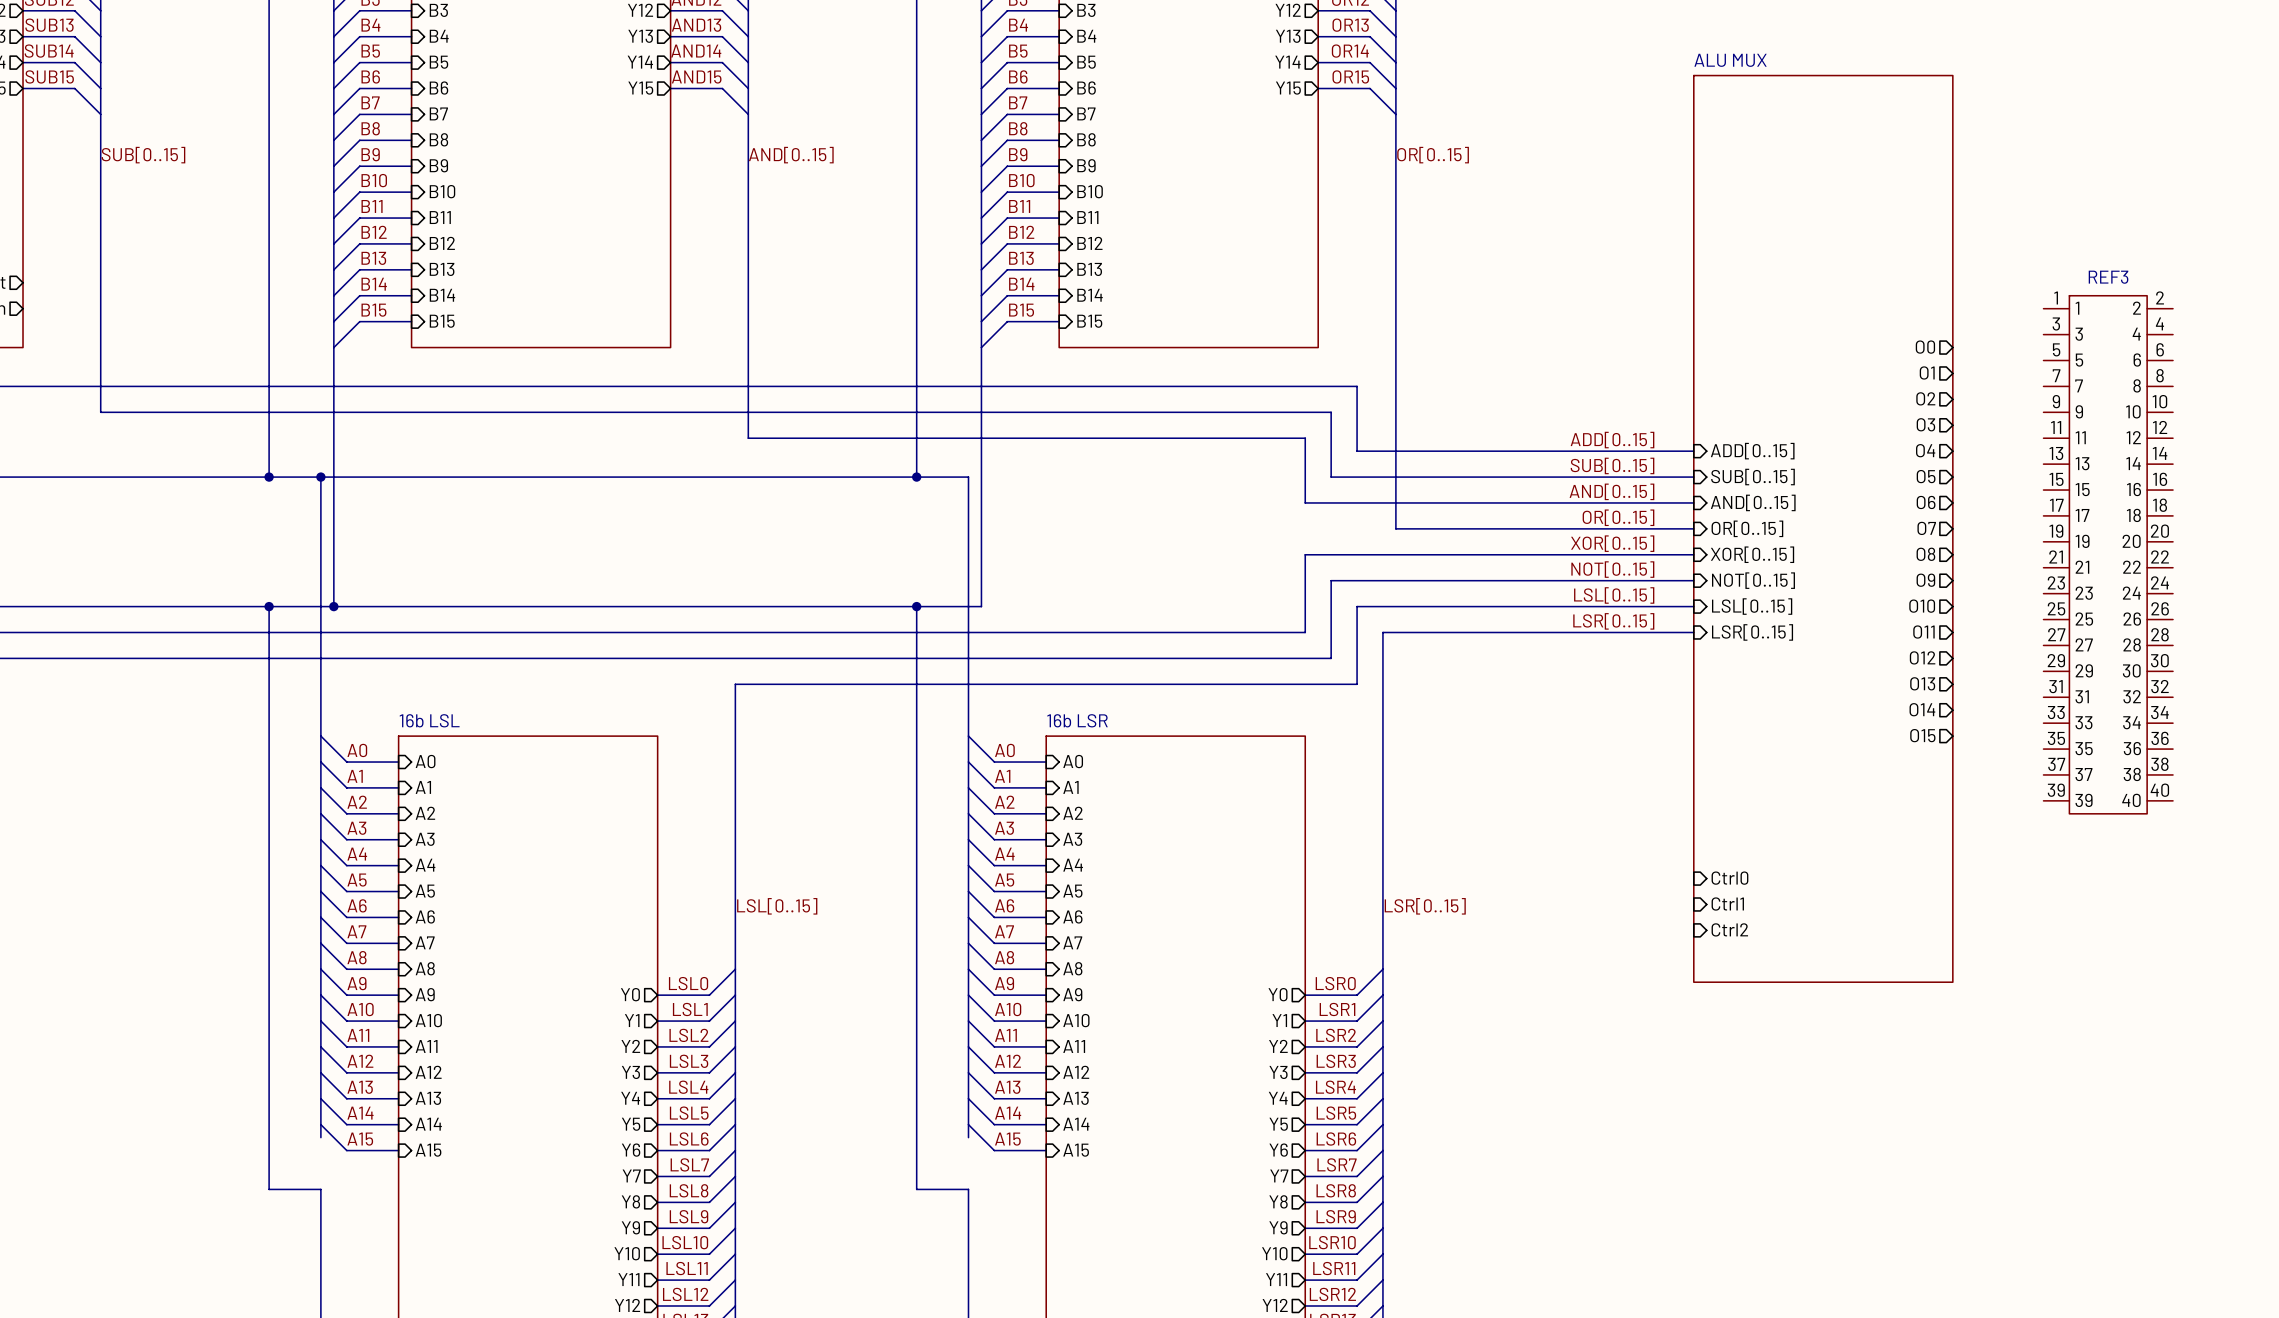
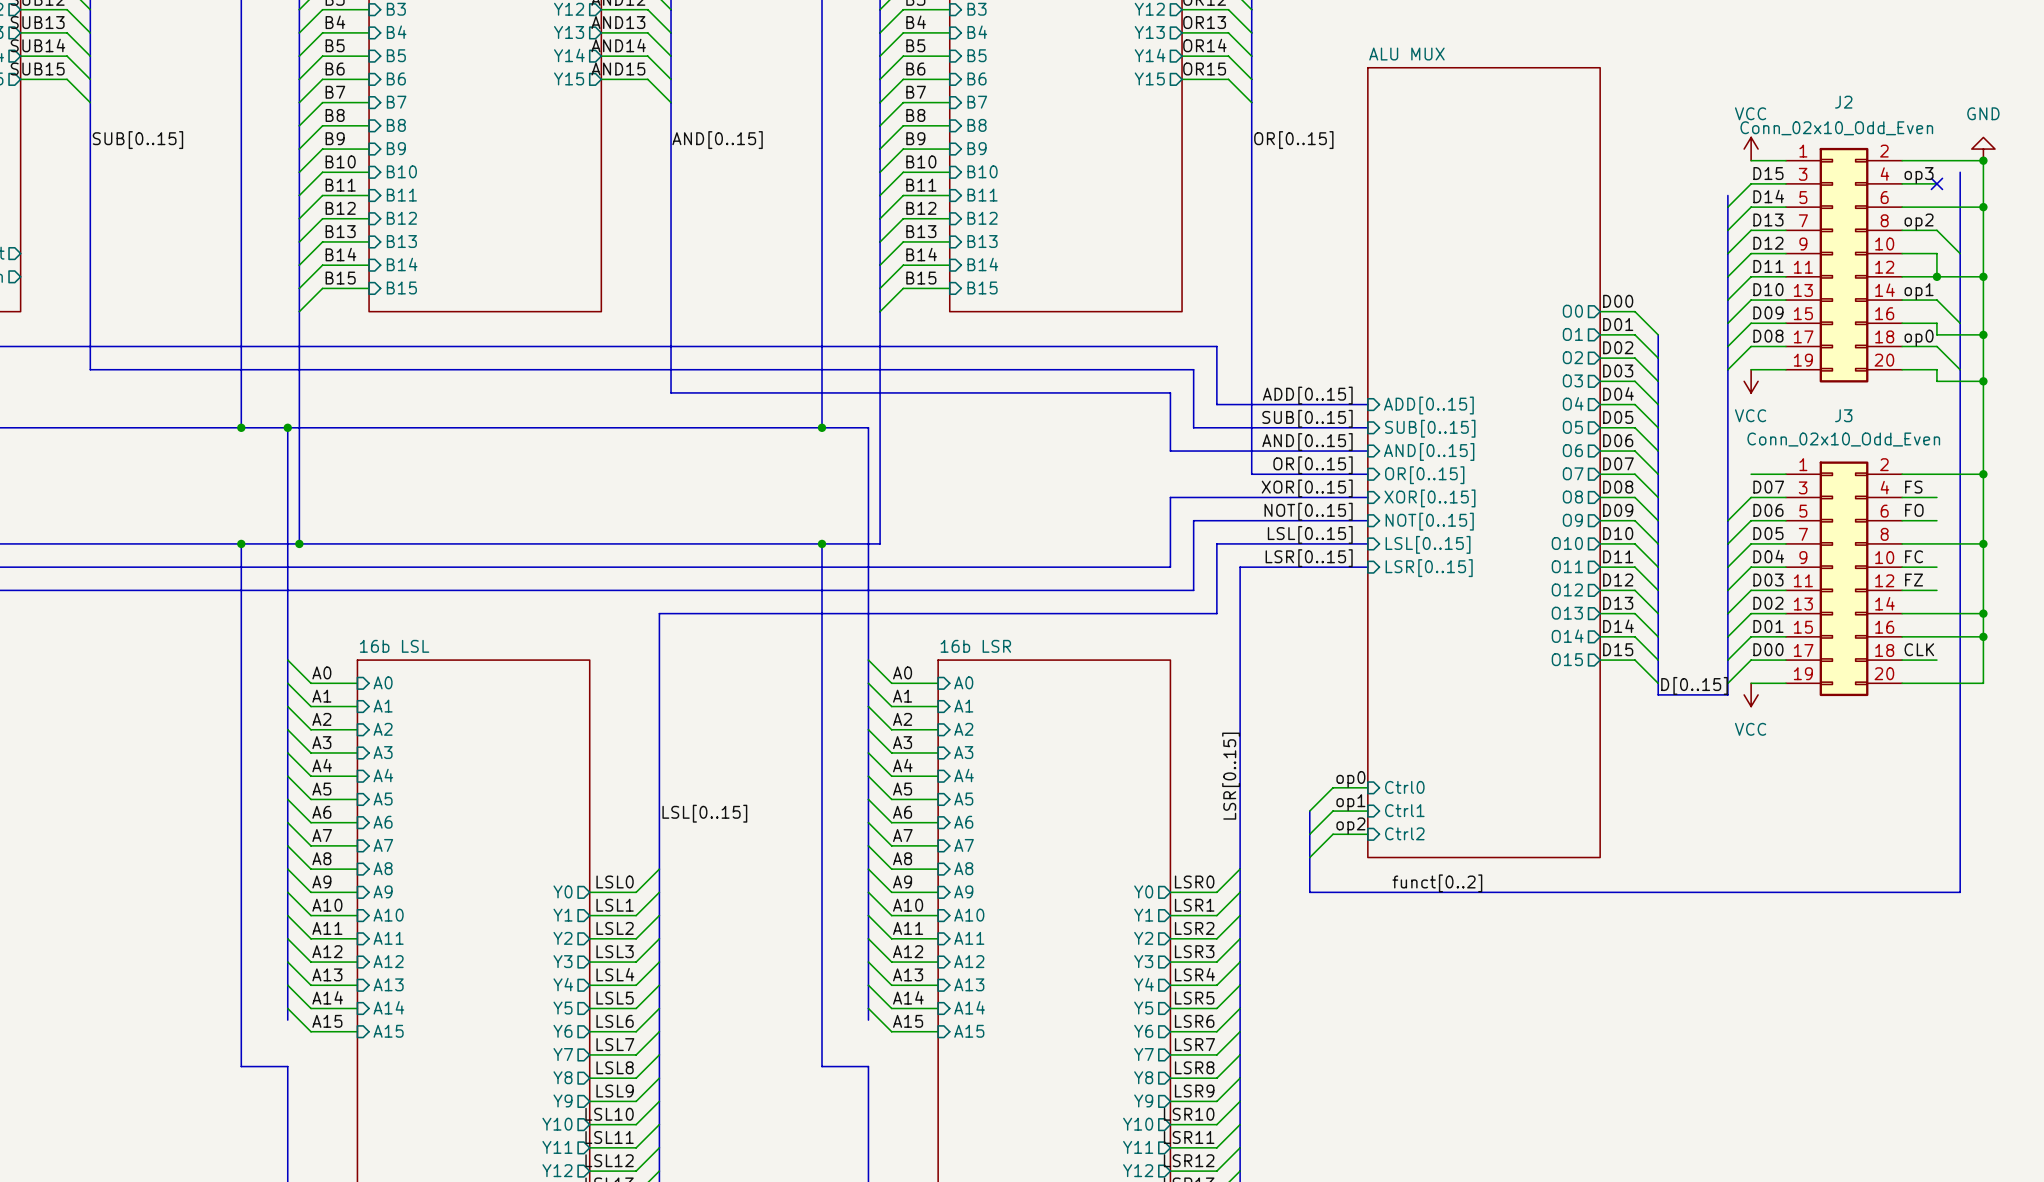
power symbol: none -> VCC (1751, 149)
power symbol: none -> GND (1983, 149)
wire: none -> (1751, 160) (1785, 160)
wire: none -> (1902, 160) (1983, 160) (1983, 683) (1902, 683)
junction: none -> (1983, 160)
bus: none -> (1960, 172) (1960, 892) (1309, 892) (1309, 811)
label: none -> D15 (1768, 173)
label: none -> op3 (1919, 175)
wire: none -> (1785, 183) (1751, 183) (1727, 207)
wire: none -> (1902, 183) (1936, 183)
no-connect mark: none -> (1936, 183)
bus: none -> (1727, 195) (1727, 694) (1658, 694) (1658, 334)
label: none -> D14 (1768, 196)
wire: none -> (1785, 207) (1751, 207) (1727, 230)
wire: none -> (1902, 207) (1983, 207)
junction: none -> (1983, 207)
label: none -> D13 (1768, 219)
label: none -> op2 (1919, 221)
wire: none -> (1785, 230) (1751, 230) (1727, 253)
wire: none -> (1902, 230) (1936, 230) (1960, 253)
label: none -> D12 (1768, 243)
wire: none -> (1785, 253) (1751, 253) (1727, 276)
wire: none -> (1902, 253) (1936, 253) (1936, 276)
J2: none -> Conn_02x10_Odd_Even (1844, 265)
label: none -> D11 (1768, 266)
wire: none -> (1785, 276) (1751, 276) (1727, 300)
wire: none -> (1902, 276) (1983, 276)
junction: none -> (1936, 276)
junction: none -> (1983, 276)
label: none -> D10 (1768, 289)
label: none -> op1 (1919, 291)
wire: none -> (1785, 300) (1751, 300) (1727, 323)
wire: none -> (1902, 300) (1936, 300) (1960, 323)
label: none -> D00 (1618, 301)
wire: none -> (1600, 311) (1634, 311) (1658, 334)
sheet pin position: O0 (1925, 347) -> O0 (1572, 311)
label: none -> D09 (1768, 312)
wire: none -> (1785, 323) (1751, 323) (1727, 346)
wire: none -> (1902, 323) (1936, 323) (1936, 334) (1983, 334)
label: none -> D01 (1618, 324)
sheet pin position: O1 (1927, 372) -> O1 (1572, 334)
wire: none -> (1600, 334) (1634, 334) (1658, 358)
junction: none -> (1983, 334)
label: none -> D08 (1768, 336)
label: none -> op0 (1919, 338)
wire: none -> (1785, 346) (1751, 346) (1727, 369)
wire: none -> (1902, 346) (1936, 346) (1960, 369)
label: none -> D02 (1618, 347)
sheet pin position: O2 (1925, 398) -> O2 (1572, 357)
wire: none -> (1600, 358) (1634, 358) (1658, 381)
wire: none -> (1751, 369) (1785, 369)
wire: none -> (1902, 369) (1936, 369) (1936, 381) (1983, 381)
label: none -> D03 (1618, 370)
sheet pin position: O3 (1925, 424) -> O3 (1572, 380)
wire: none -> (1600, 381) (1634, 381) (1658, 404)
power symbol: none -> VCC (1751, 381)
junction: none -> (1983, 381)
label: none -> D04 (1618, 393)
label position: ADD[0..15] (1612, 440) -> ADD[0..15] (1307, 395)
sheet pin position: O4 (1925, 450) -> O4 (1573, 403)
bus: (1525, 451) (1693, 451) -> none
sheet pin position: ADD[0..15] (1752, 451) -> ADD[0..15] (1428, 405)
wire: none -> (1600, 404) (1634, 404) (1658, 427)
label position: SUB[0..15] (1612, 465) -> SUB[0..15] (1307, 418)
label: none -> D05 (1618, 417)
sheet pin position: O5 (1926, 476) -> O5 (1572, 427)
bus: (1525, 477) (1693, 477) -> none
sheet pin position: SUB[0..15] (1753, 477) -> SUB[0..15] (1430, 428)
wire: none -> (1600, 427) (1634, 427) (1658, 451)
label position: AND[0..15] (1611, 491) -> AND[0..15] (1307, 442)
label: none -> D06 (1618, 440)
bus: (1525, 502) (1693, 502) -> none
sheet pin position: AND[0..15] (1753, 502) -> AND[0..15] (1429, 451)
wire: none -> (1600, 451) (1634, 451) (1658, 474)
sheet pin position: O6 (1926, 502) -> O6 (1572, 450)
sheet ALU MUX: none -> (1484, 462)
label position: OR[0..15] (1618, 517) -> OR[0..15] (1313, 465)
label: none -> D07 (1618, 463)
bus: (1525, 528) (1693, 528) -> none
sheet pin position: OR[0..15] (1747, 528) -> OR[0..15] (1424, 475)
wire: none -> (1600, 474) (1634, 474) (1658, 497)
sheet ALU MUX: (1823, 528) -> none
sheet pin position: O7 (1926, 528) -> O7 (1573, 473)
wire: none -> (1751, 474) (1785, 474)
wire: none -> (1902, 474) (1983, 474)
junction: none -> (1983, 474)
label position: XOR[0..15] (1612, 543) -> XOR[0..15] (1307, 488)
label: none -> D08 (1618, 487)
label: none -> D07 (1768, 487)
label: none -> FS (1913, 487)
bus: (1525, 554) (1693, 554) -> none
sheet pin position: XOR[0..15] (1752, 554) -> XOR[0..15] (1429, 498)
wire: none -> (1600, 497) (1634, 497) (1658, 520)
sheet pin position: O8 (1925, 554) -> O8 (1572, 497)
wire: none -> (1785, 497) (1751, 497) (1727, 520)
REF3: (2108, 554) -> none
wire: none -> (1902, 497) (1936, 497)
label position: NOT[0..15] (1612, 569) -> NOT[0..15] (1308, 511)
label: none -> D09 (1618, 510)
label: none -> D06 (1768, 510)
label: none -> FO (1914, 510)
bus: (1525, 580) (1693, 580) -> none
sheet pin position: NOT[0..15] (1753, 580) -> NOT[0..15] (1429, 521)
wire: none -> (1600, 520) (1634, 520) (1658, 543)
sheet pin position: O9 (1925, 580) -> O9 (1572, 520)
wire: none -> (1785, 520) (1751, 520) (1727, 543)
wire: none -> (1902, 520) (1936, 520)
label position: LSL[0..15] (1614, 595) -> LSL[0..15] (1310, 534)
label: none -> D10 (1618, 533)
label: none -> D05 (1768, 533)
bus: (1525, 606) (1693, 606) -> none
sheet pin position: LSL[0..15] (1752, 606) -> LSL[0..15] (1428, 544)
wire: none -> (1600, 543) (1634, 543) (1658, 567)
sheet pin position: O10 (1922, 606) -> O10 (1567, 543)
wire: none -> (1785, 543) (1751, 543) (1727, 567)
wire: none -> (1902, 543) (1983, 543)
junction: none -> (1983, 543)
label: none -> D11 (1618, 556)
label: none -> D04 (1768, 556)
label: none -> FC (1914, 556)
label position: LSR[0..15] (1613, 621) -> LSR[0..15] (1309, 558)
bus: (1525, 632) (1693, 632) -> none
sheet pin position: LSR[0..15] (1752, 632) -> LSR[0..15] (1429, 568)
wire: none -> (1600, 567) (1634, 567) (1658, 590)
sheet pin position: O11 (1923, 632) -> O11 (1567, 566)
wire: none -> (1785, 567) (1751, 567) (1727, 590)
wire: none -> (1902, 567) (1936, 567)
J3: none -> Conn_02x10_Odd_Even (1844, 578)
label: none -> D12 (1618, 580)
label: none -> D03 (1768, 580)
label: none -> FZ (1914, 580)
sheet pin position: O12 (1922, 657) -> O12 (1567, 589)
wire: none -> (1600, 590) (1634, 590) (1658, 613)
wire: none -> (1785, 590) (1751, 590) (1727, 613)
wire: none -> (1902, 590) (1936, 590)
label: none -> D13 (1618, 603)
label: none -> D02 (1768, 603)
sheet pin position: O13 (1922, 683) -> O13 (1567, 613)
wire: none -> (1600, 613) (1634, 613) (1658, 636)
wire: none -> (1785, 613) (1751, 613) (1727, 636)
wire: none -> (1902, 613) (1983, 613)
junction: none -> (1983, 613)
label: none -> D14 (1618, 626)
label: none -> D01 (1768, 626)
sheet pin position: O14 (1922, 709) -> O14 (1567, 636)
wire: none -> (1600, 636) (1634, 636) (1658, 660)
wire: none -> (1785, 636) (1751, 636) (1727, 660)
wire: none -> (1902, 636) (1983, 636)
junction: none -> (1983, 636)
label: none -> D15 (1618, 649)
label: none -> D00 (1768, 649)
label: none -> CLK (1919, 649)
sheet pin position: O15 (1922, 735) -> O15 (1567, 659)
wire: none -> (1600, 660) (1634, 660) (1658, 683)
wire: none -> (1785, 660) (1751, 660) (1727, 683)
wire: none -> (1902, 660) (1936, 660)
wire: none -> (1751, 683) (1785, 683)
label: none -> D[0..15] (1694, 685)
power symbol: none -> VCC (1751, 694)
label: none -> op0 (1350, 779)
wire: none -> (1367, 787) (1333, 787) (1309, 811)
sheet pin position: Ctrl0 (1729, 878) -> Ctrl0 (1404, 787)
label: none -> op1 (1350, 802)
wire: none -> (1367, 811) (1333, 811) (1309, 834)
sheet pin position: Ctrl1 (1727, 904) -> Ctrl1 (1404, 810)
label rotation: 0° (1425, 906) -> 90° counterclockwise (1231, 776)
label: none -> op2 (1350, 825)
sheet pin position: Ctrl2 (1729, 929) -> Ctrl2 (1404, 833)
wire: none -> (1367, 834) (1333, 834) (1309, 857)
label: none -> funct[0..2] (1437, 883)

